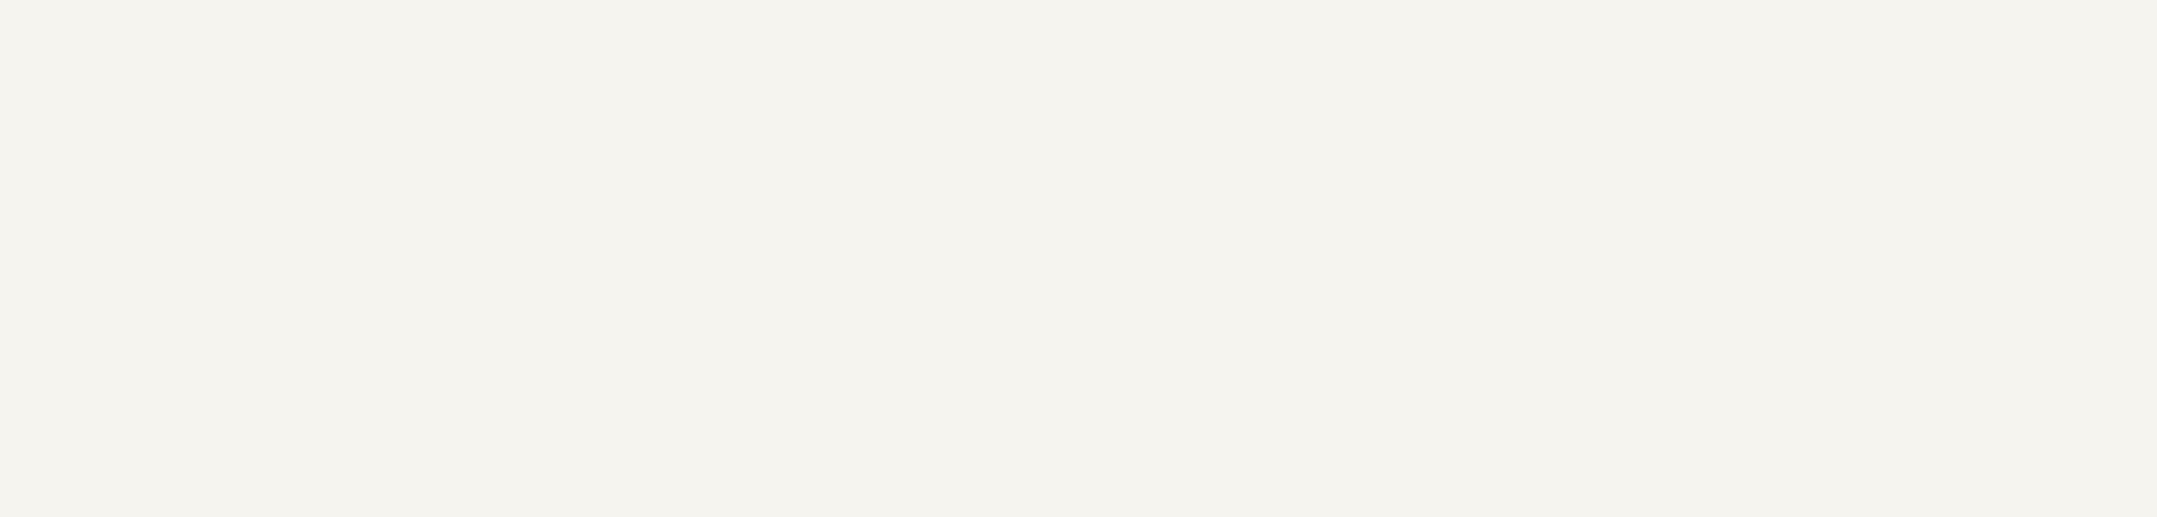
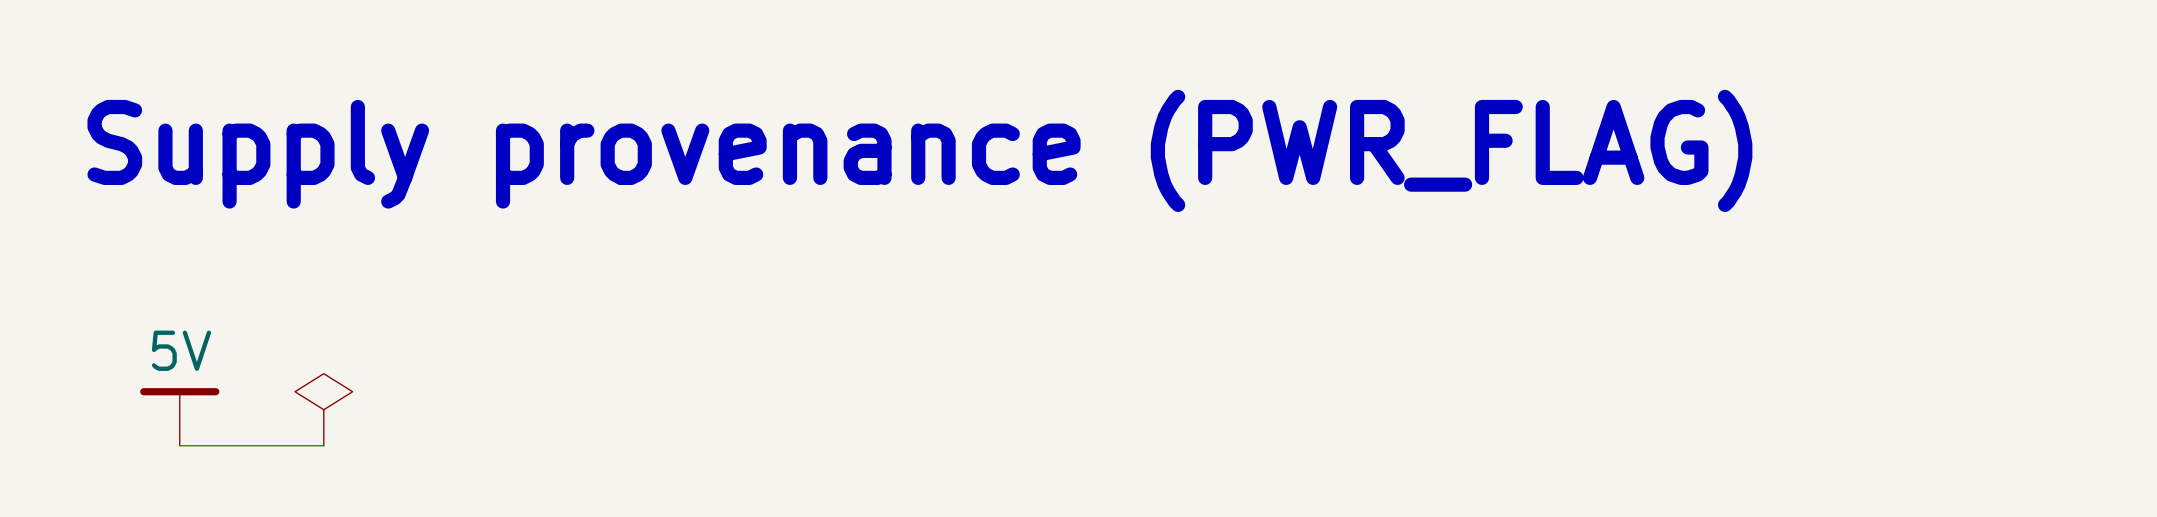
text: none -> Supply provenance (PWR_FLAG) (919, 150)
power symbol: none -> (323, 409)
power symbol: none -> 5V (179, 416)
wire: none -> (179, 445) (323, 445)

